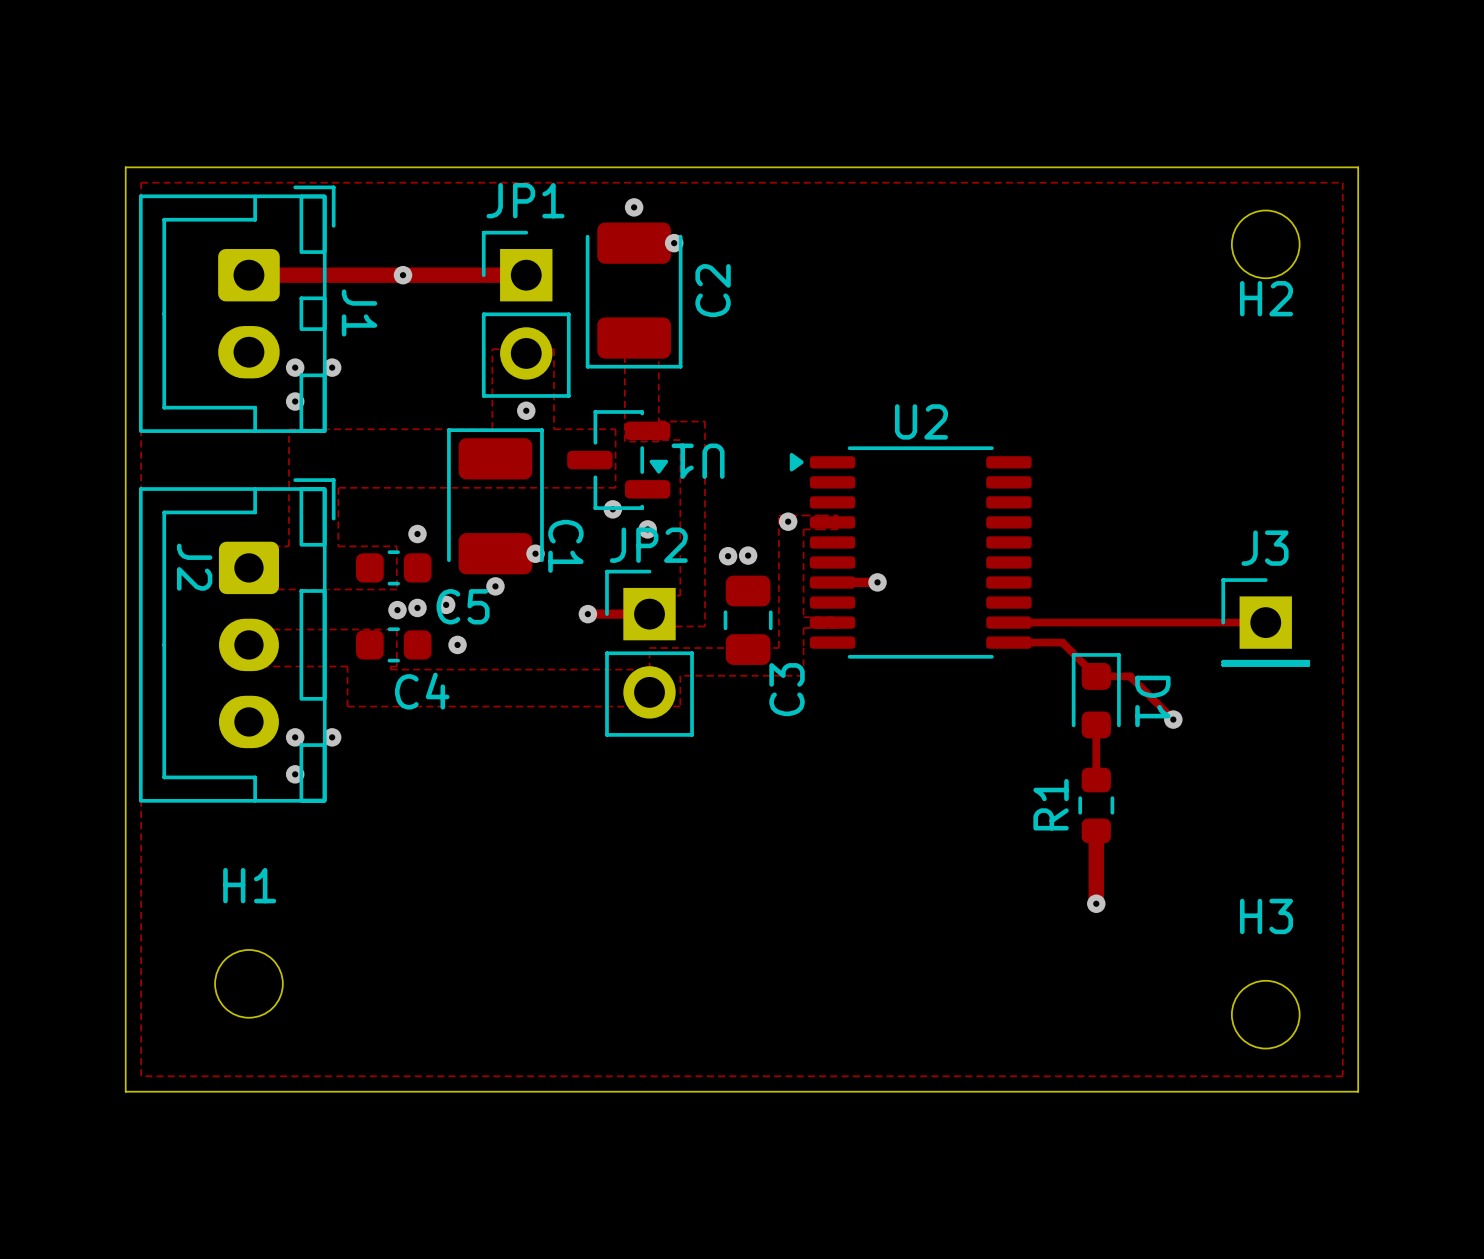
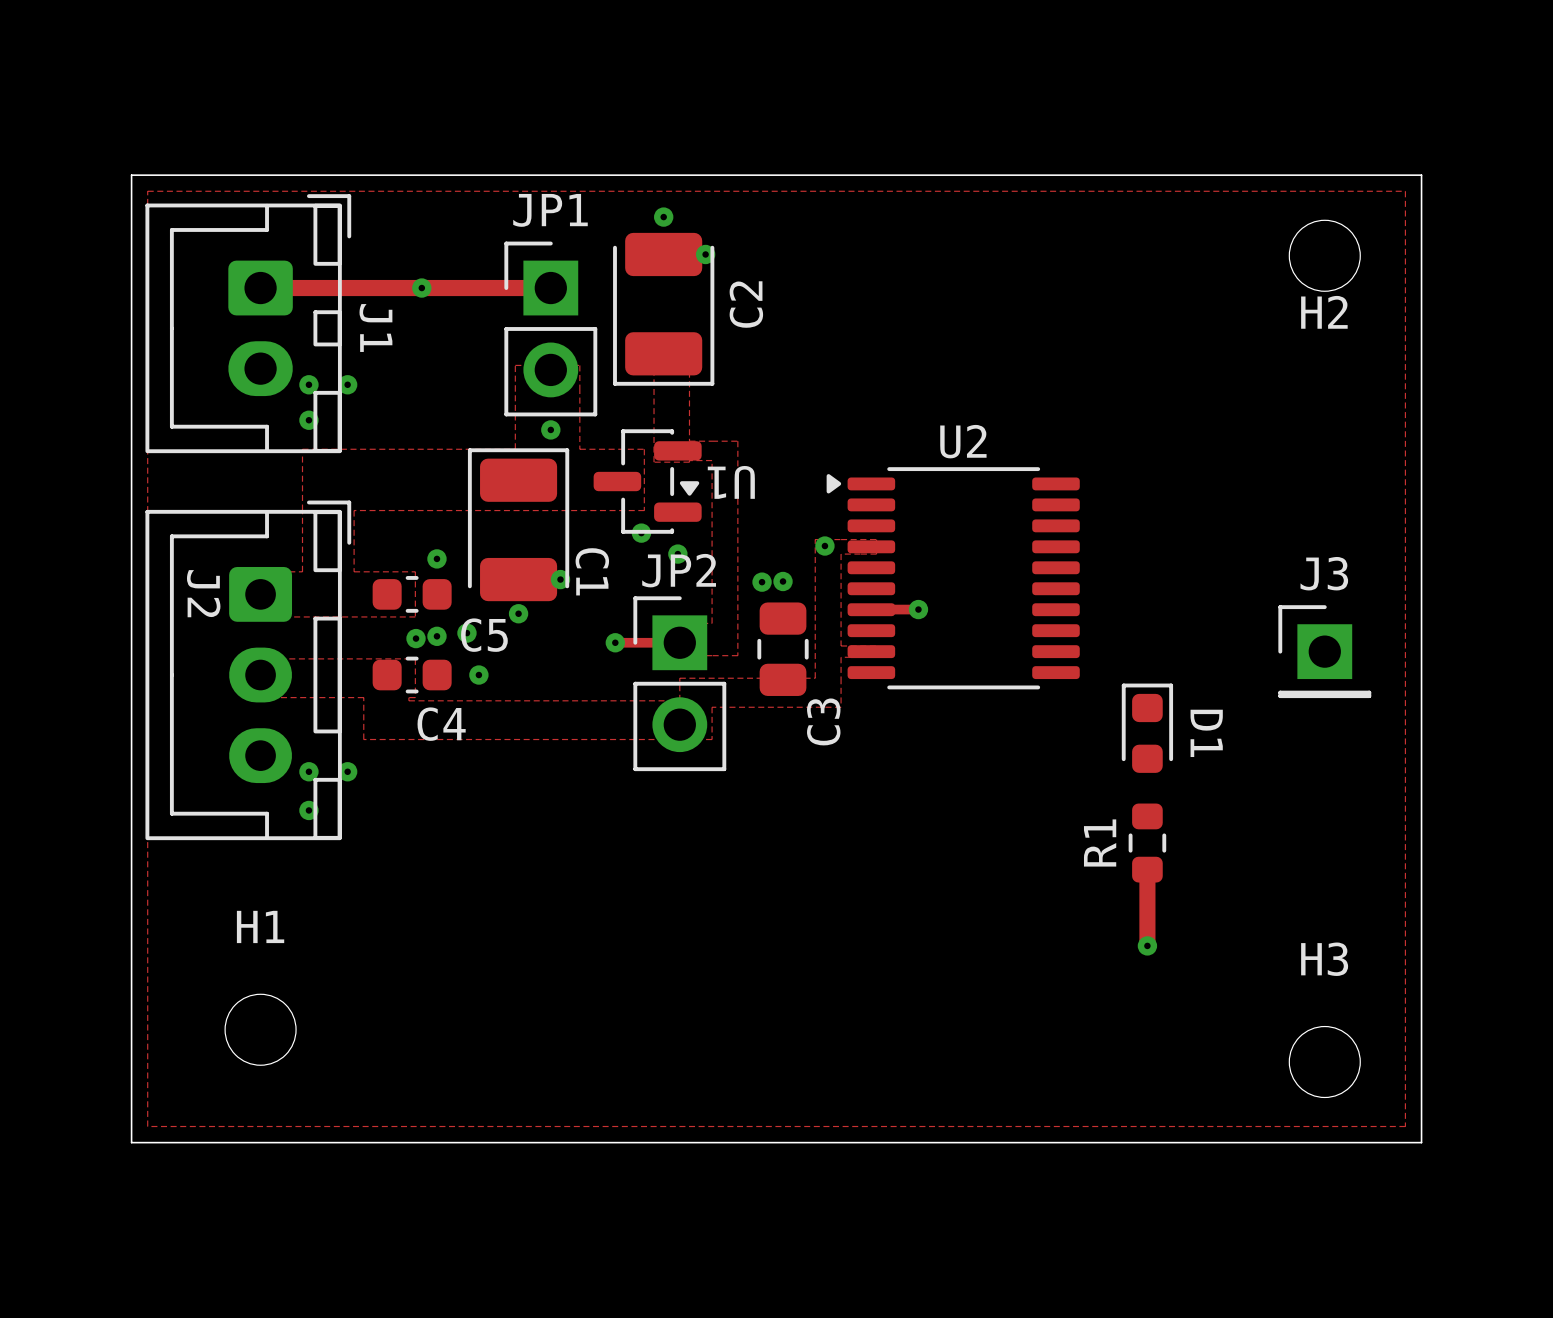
track: (1008, 622) (1265, 622) -> none
track: (1008, 642) (1062, 642) (1096, 676) (1130, 676) (1173, 719) -> none
via: (1173, 719) -> none
track: (1096, 724) (1096, 780) -> none

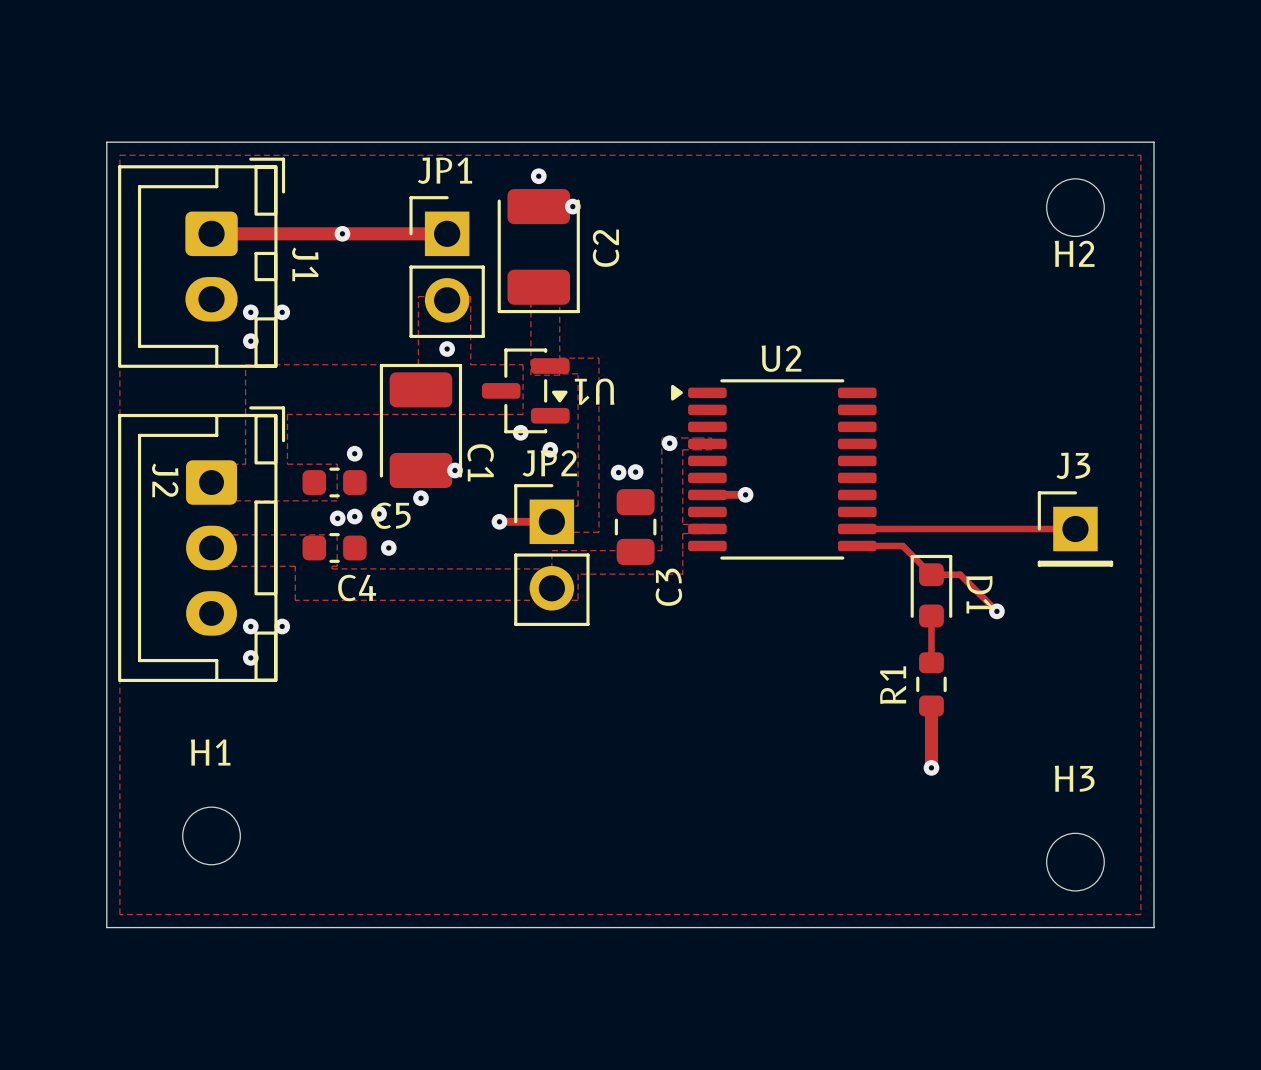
track: none -> (857, 528) (1075, 528)
track: none -> (857, 546) (902, 546) (931, 574) (960, 574) (996, 611)
via: none -> (996, 611)
track: none -> (931, 615) (931, 662)

